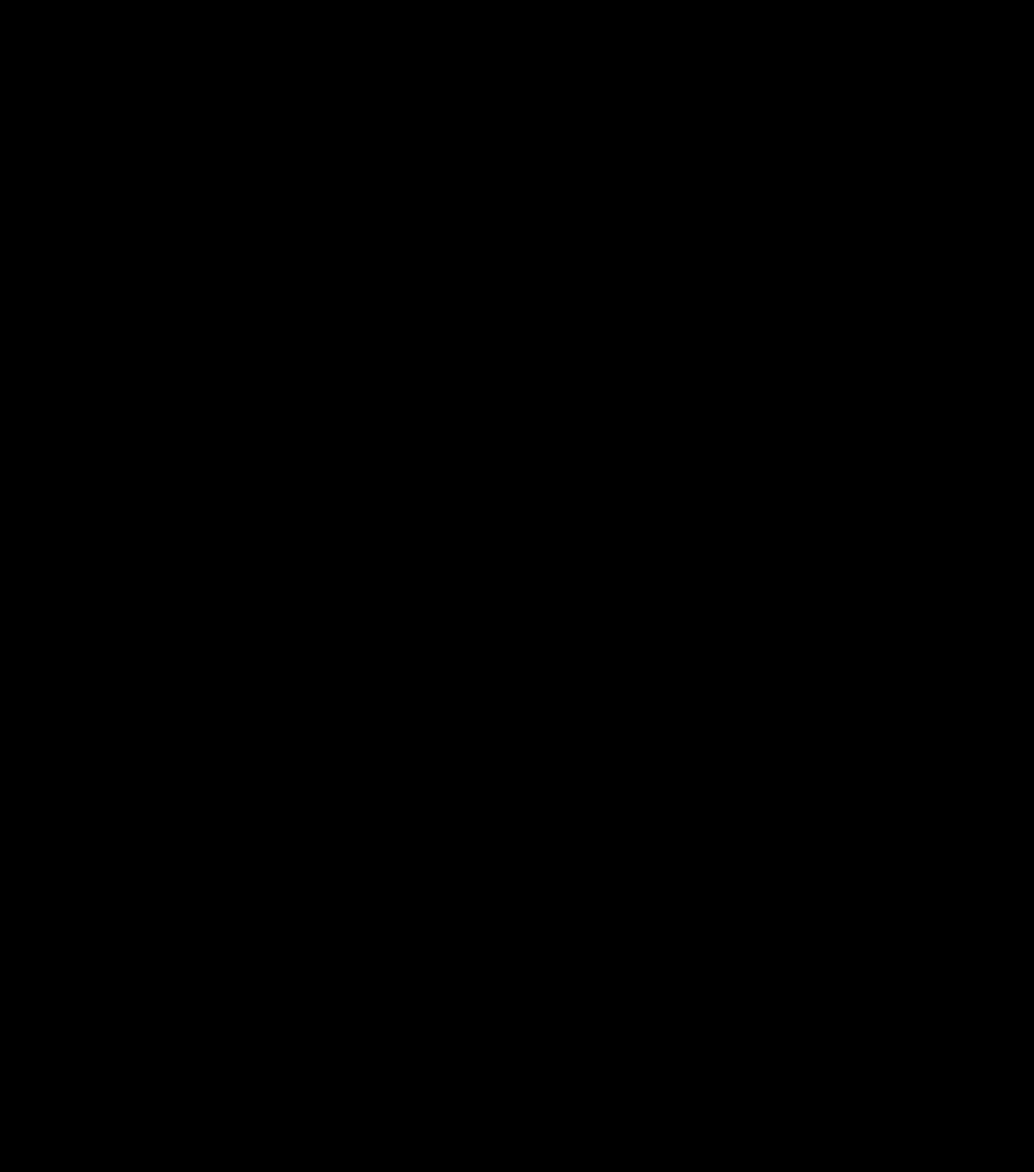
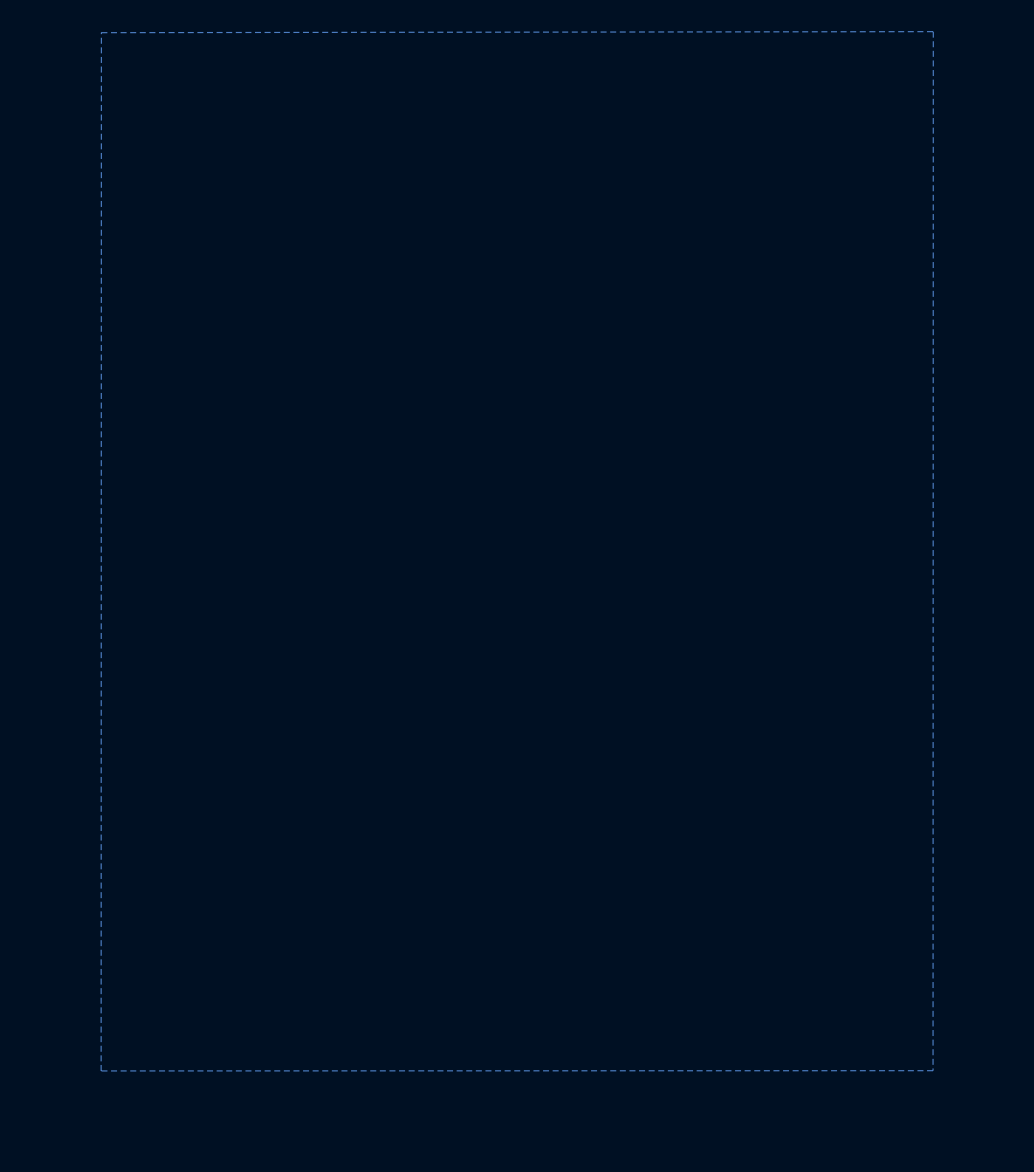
bottom zone outline: none -> (933, 31) (101, 32) (101, 1070) (933, 1070) (933, 31)

